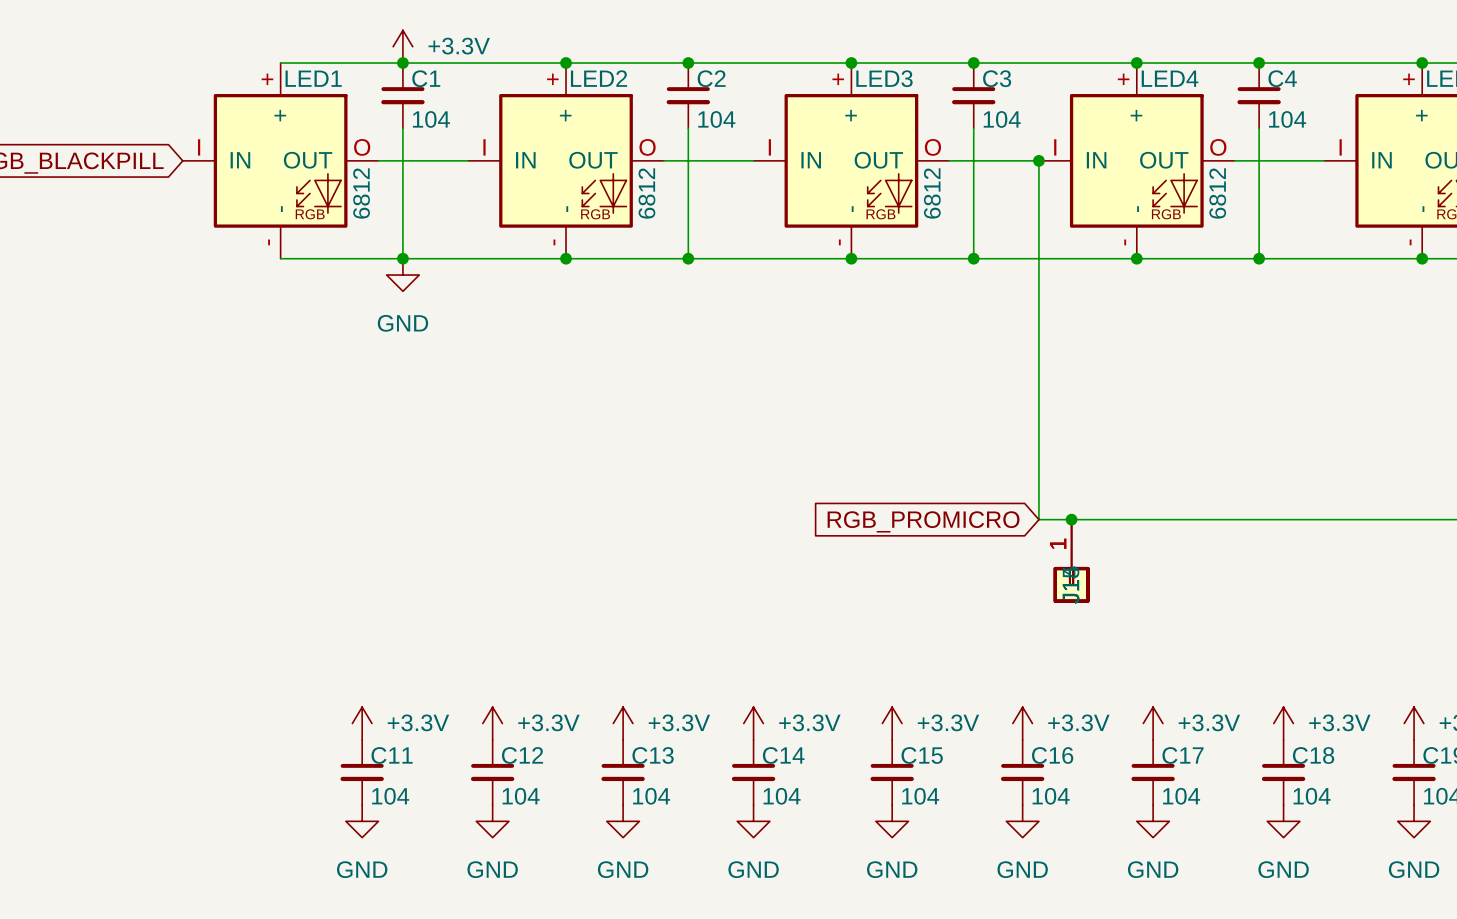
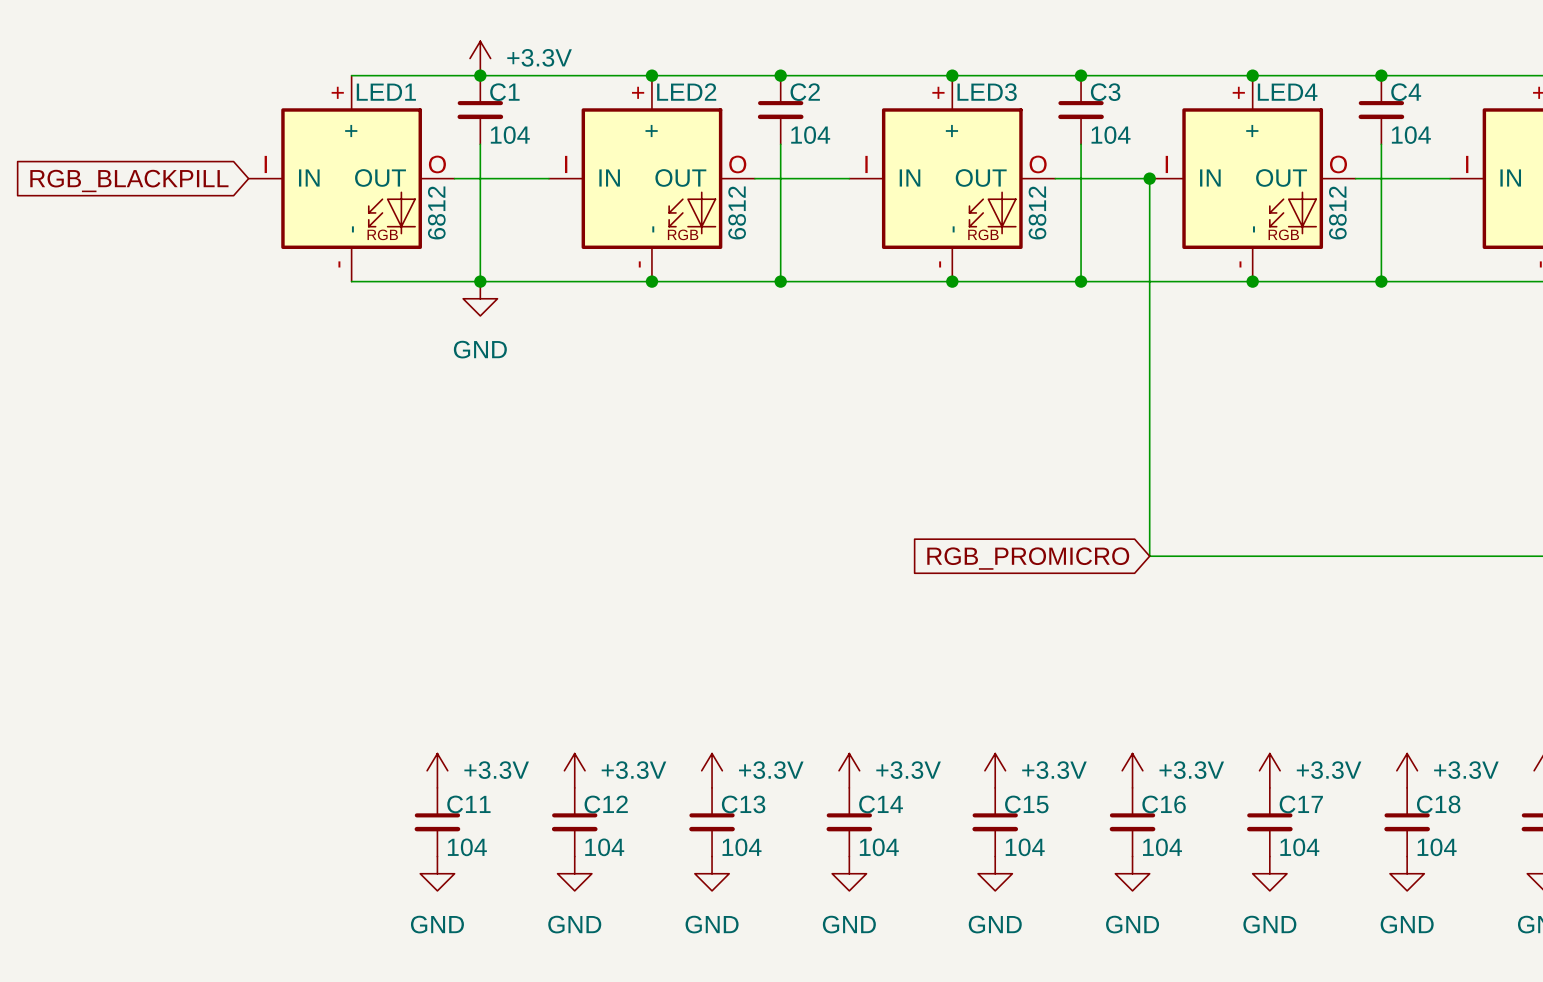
junction: (1071, 519) -> none
part: (1071, 561) -> none
part: (1071, 561) -> none

